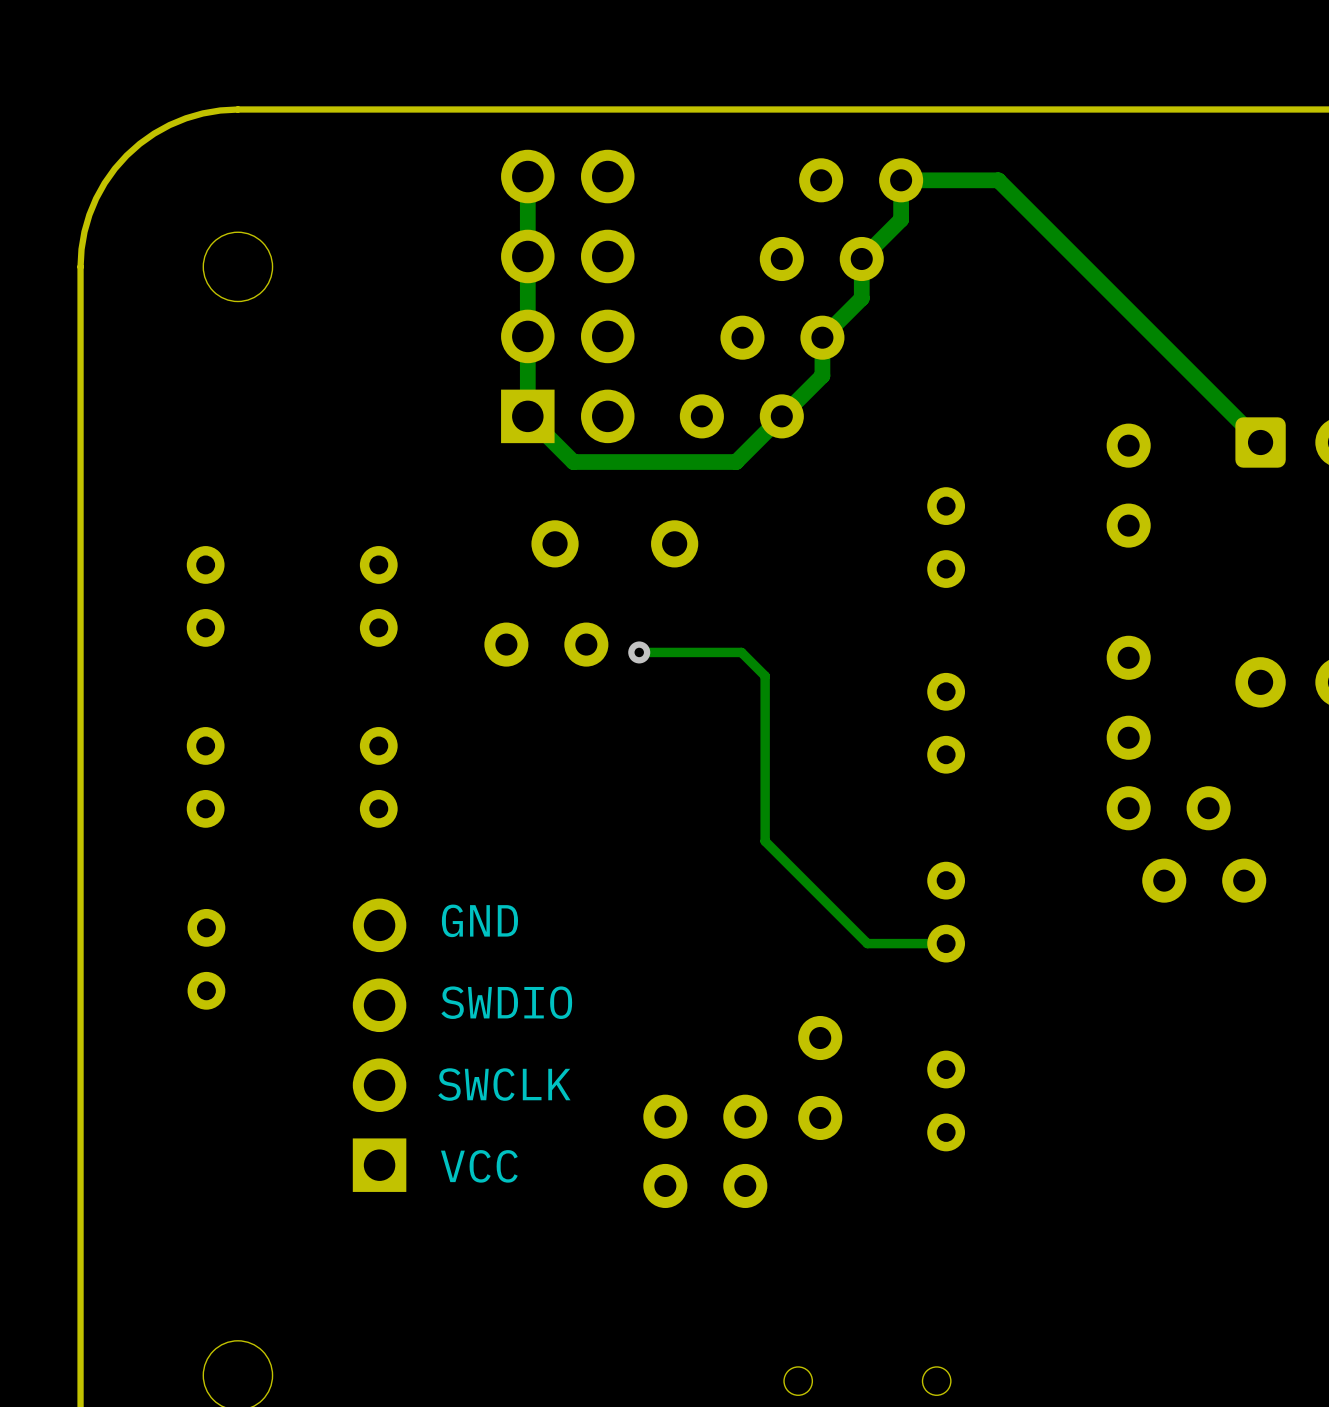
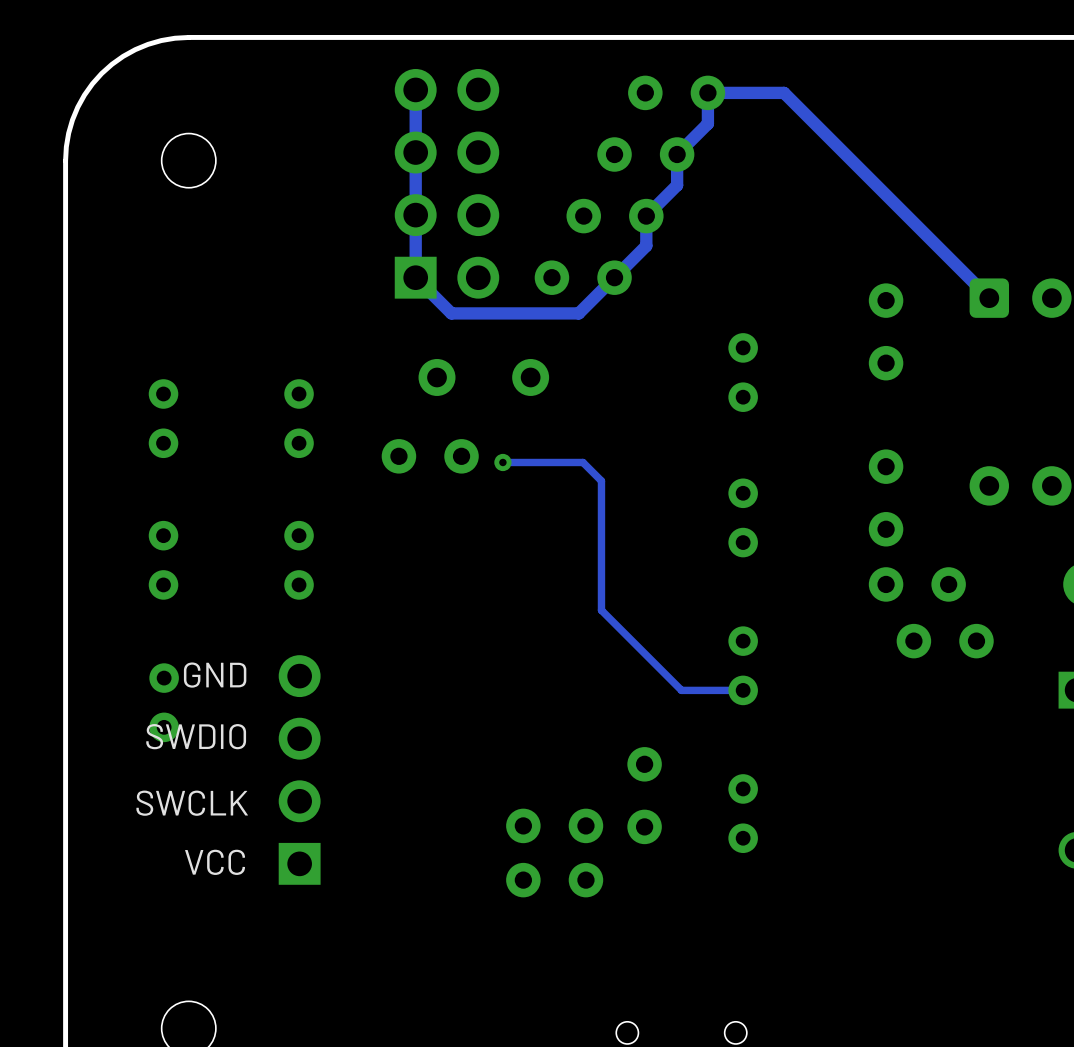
text position: GND (479, 920) -> GND (215, 675)
text position: SWDIO (506, 1002) -> SWDIO (196, 736)
text position: SWCLK (504, 1084) -> SWCLK (192, 803)
text position: VCC (479, 1166) -> VCC (215, 862)

